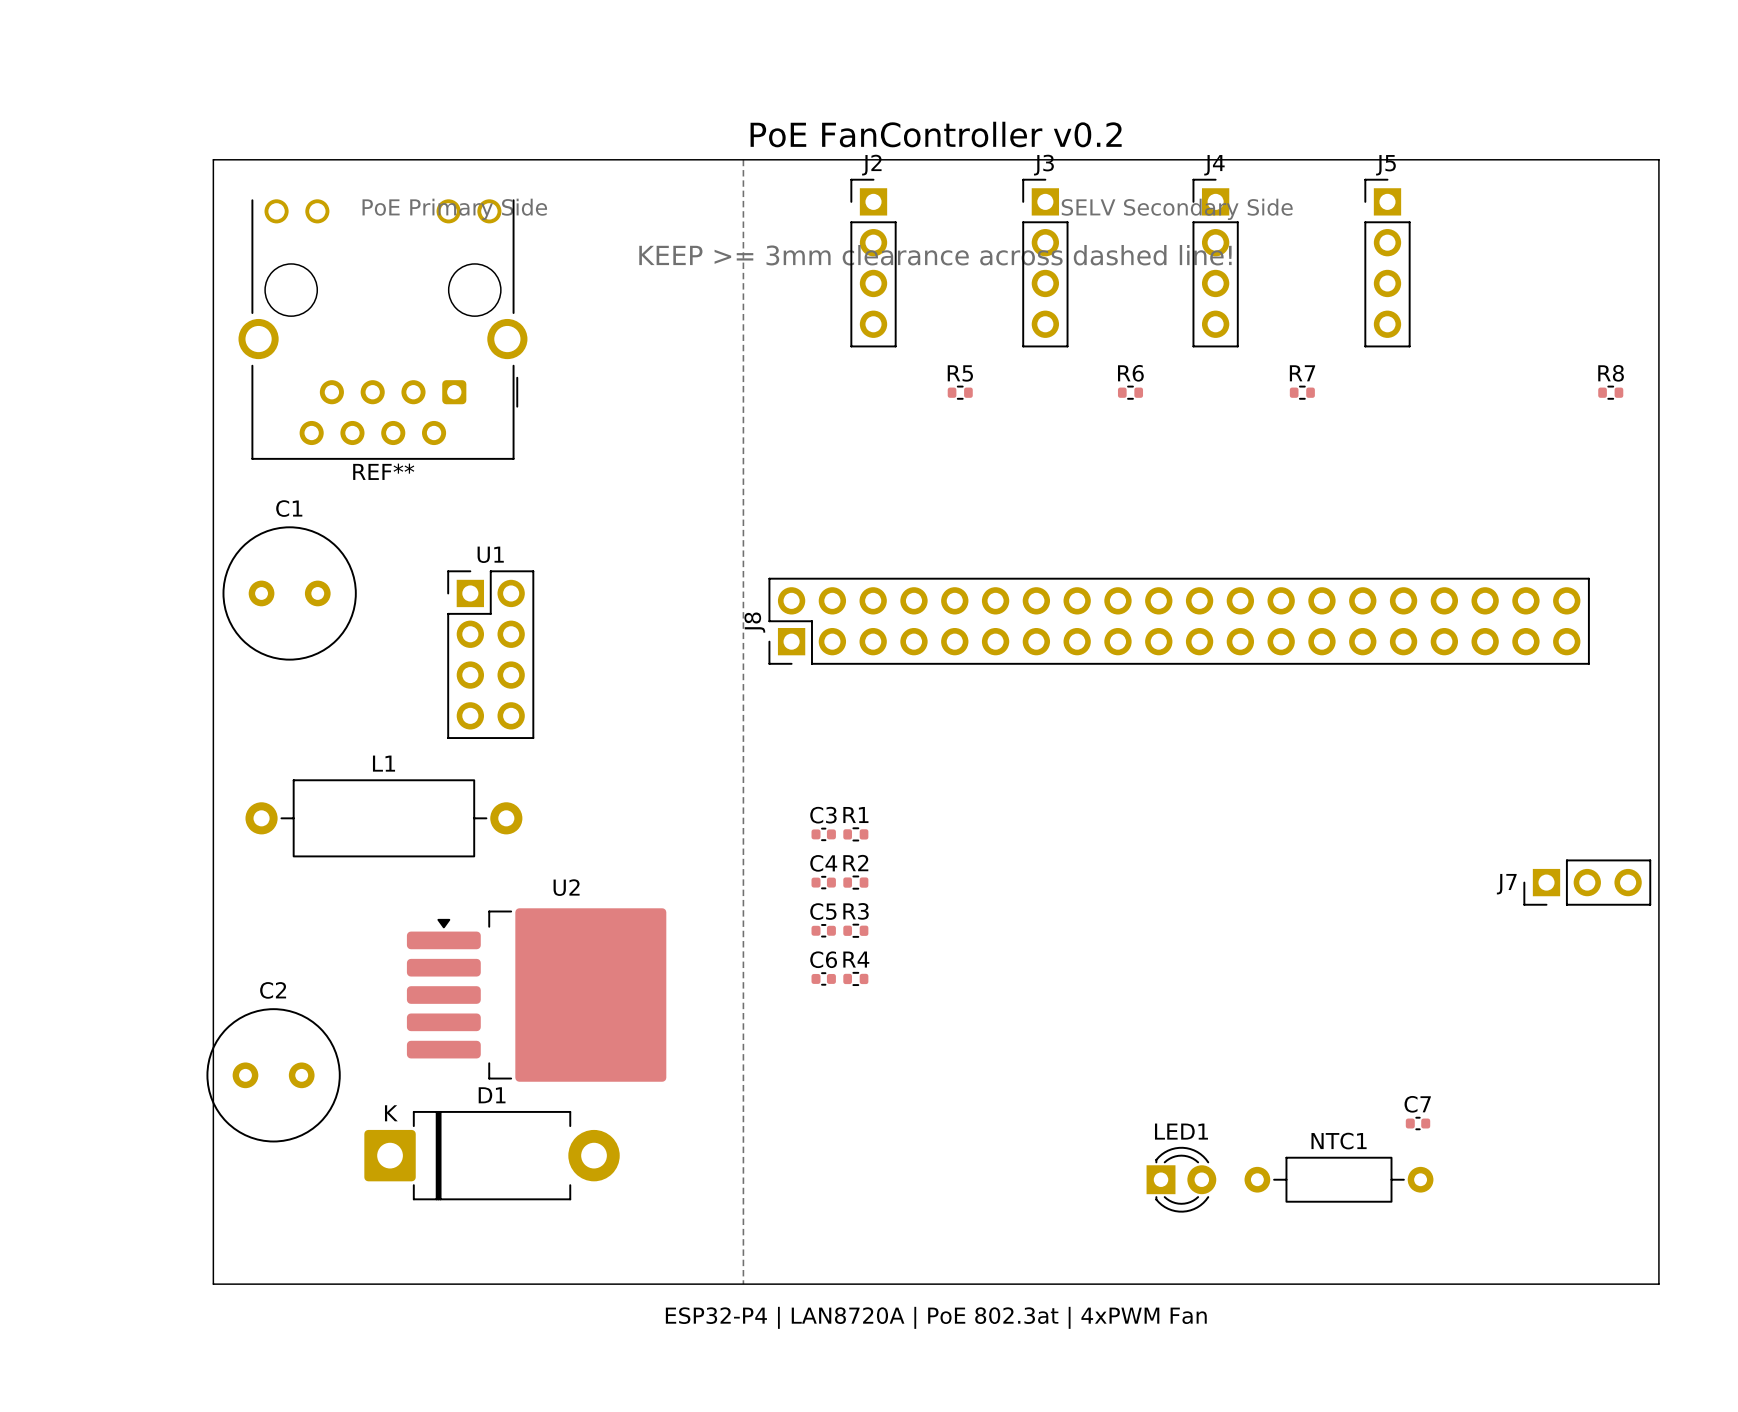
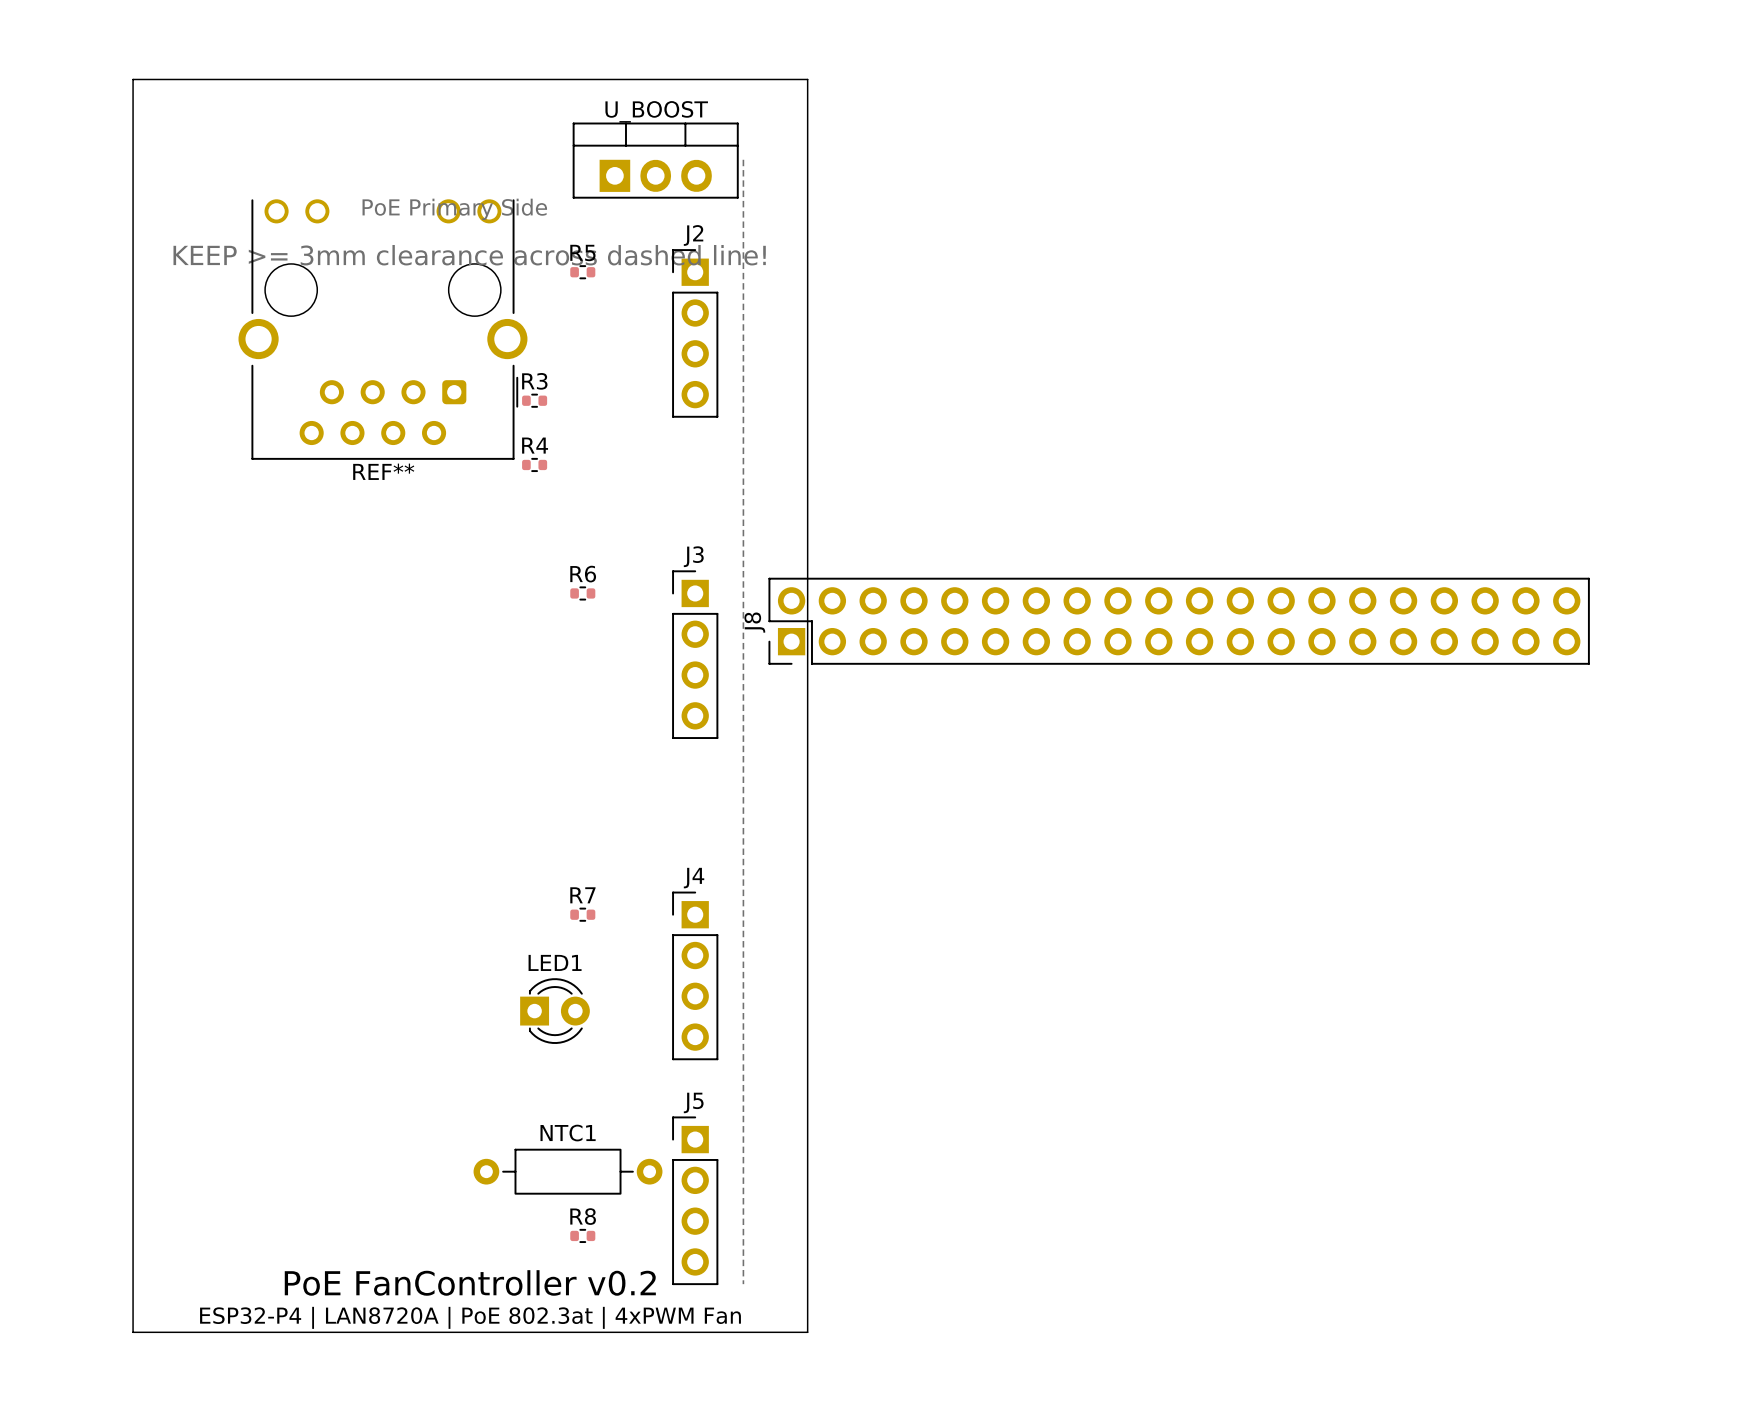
board edge: none -> (133, 79) (807, 79) (807, 1332) (133, 1332) (133, 79)
text: PoE FanController v0.2 (936, 134) -> none
board edge: (213, 159) (1658, 159) (1658, 1284) (213, 1284) (213, 159) -> none
U_BOOST: none -> (655, 160)
text: SELV Secondary Side (1177, 209) -> none
text: none -> KEEP >= 3mm clearance across dashed line! (469, 255)
text: KEEP >= 3mm clearance across dashed line! (935, 255) -> none
J2 position: (873, 263) -> (695, 333)
J3 position: (1045, 263) -> (695, 654)
J4 position: (1215, 263) -> (695, 975)
J5 position: (1387, 263) -> (695, 1200)
R5 position: (960, 392) -> (582, 272)
R6 position: (1130, 392) -> (582, 593)
R7 position: (1302, 392) -> (582, 914)
R8 position: (1610, 392) -> (582, 1235)
C1: (289, 593) -> none
U1: (490, 654) -> none
L1: (383, 818) -> none
C3: (823, 834) -> none
R1: (855, 834) -> none
C4: (823, 882) -> none
R2: (855, 882) -> none
J7: (1587, 882) -> none
C5: (823, 930) -> none
R3 position: (855, 930) -> (534, 400)
C6: (823, 978) -> none
R4 position: (855, 978) -> (534, 464)
U2: (536, 995) -> none
C2: (273, 1075) -> none
C7: (1418, 1123) -> none
D1: (492, 1155) -> none
LED1 position: (1181, 1179) -> (555, 1011)
NTC1 position: (1338, 1179) -> (568, 1171)
text: none -> PoE FanController v0.2 (470, 1282)
text: none -> ESP32-P4 | LAN8720A | PoE 802.3at | 4xPWM Fan (470, 1317)
text: ESP32-P4 | LAN8720A | PoE 802.3at | 4xPWM Fan (936, 1317) -> none

